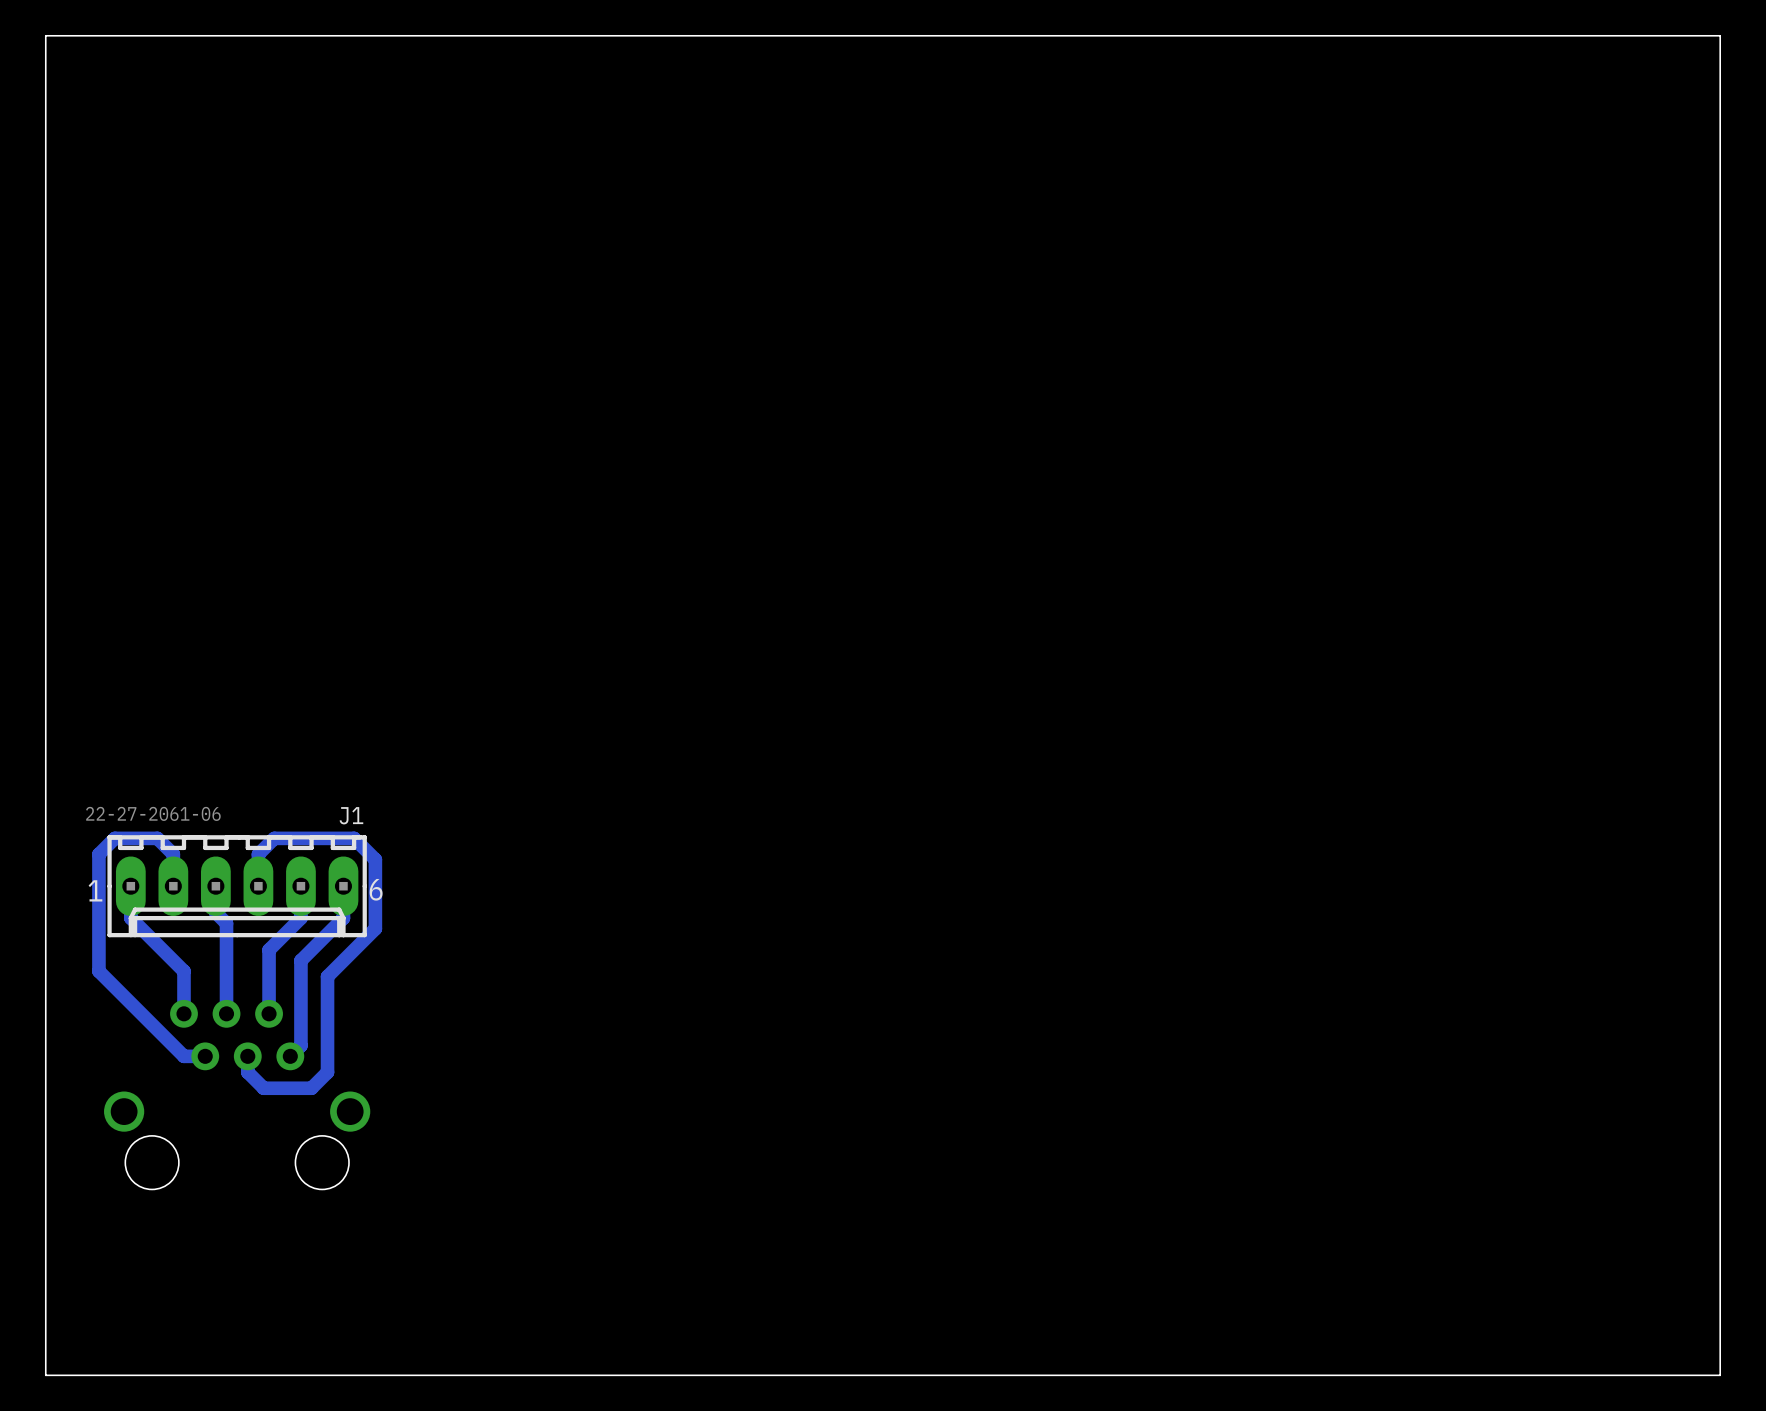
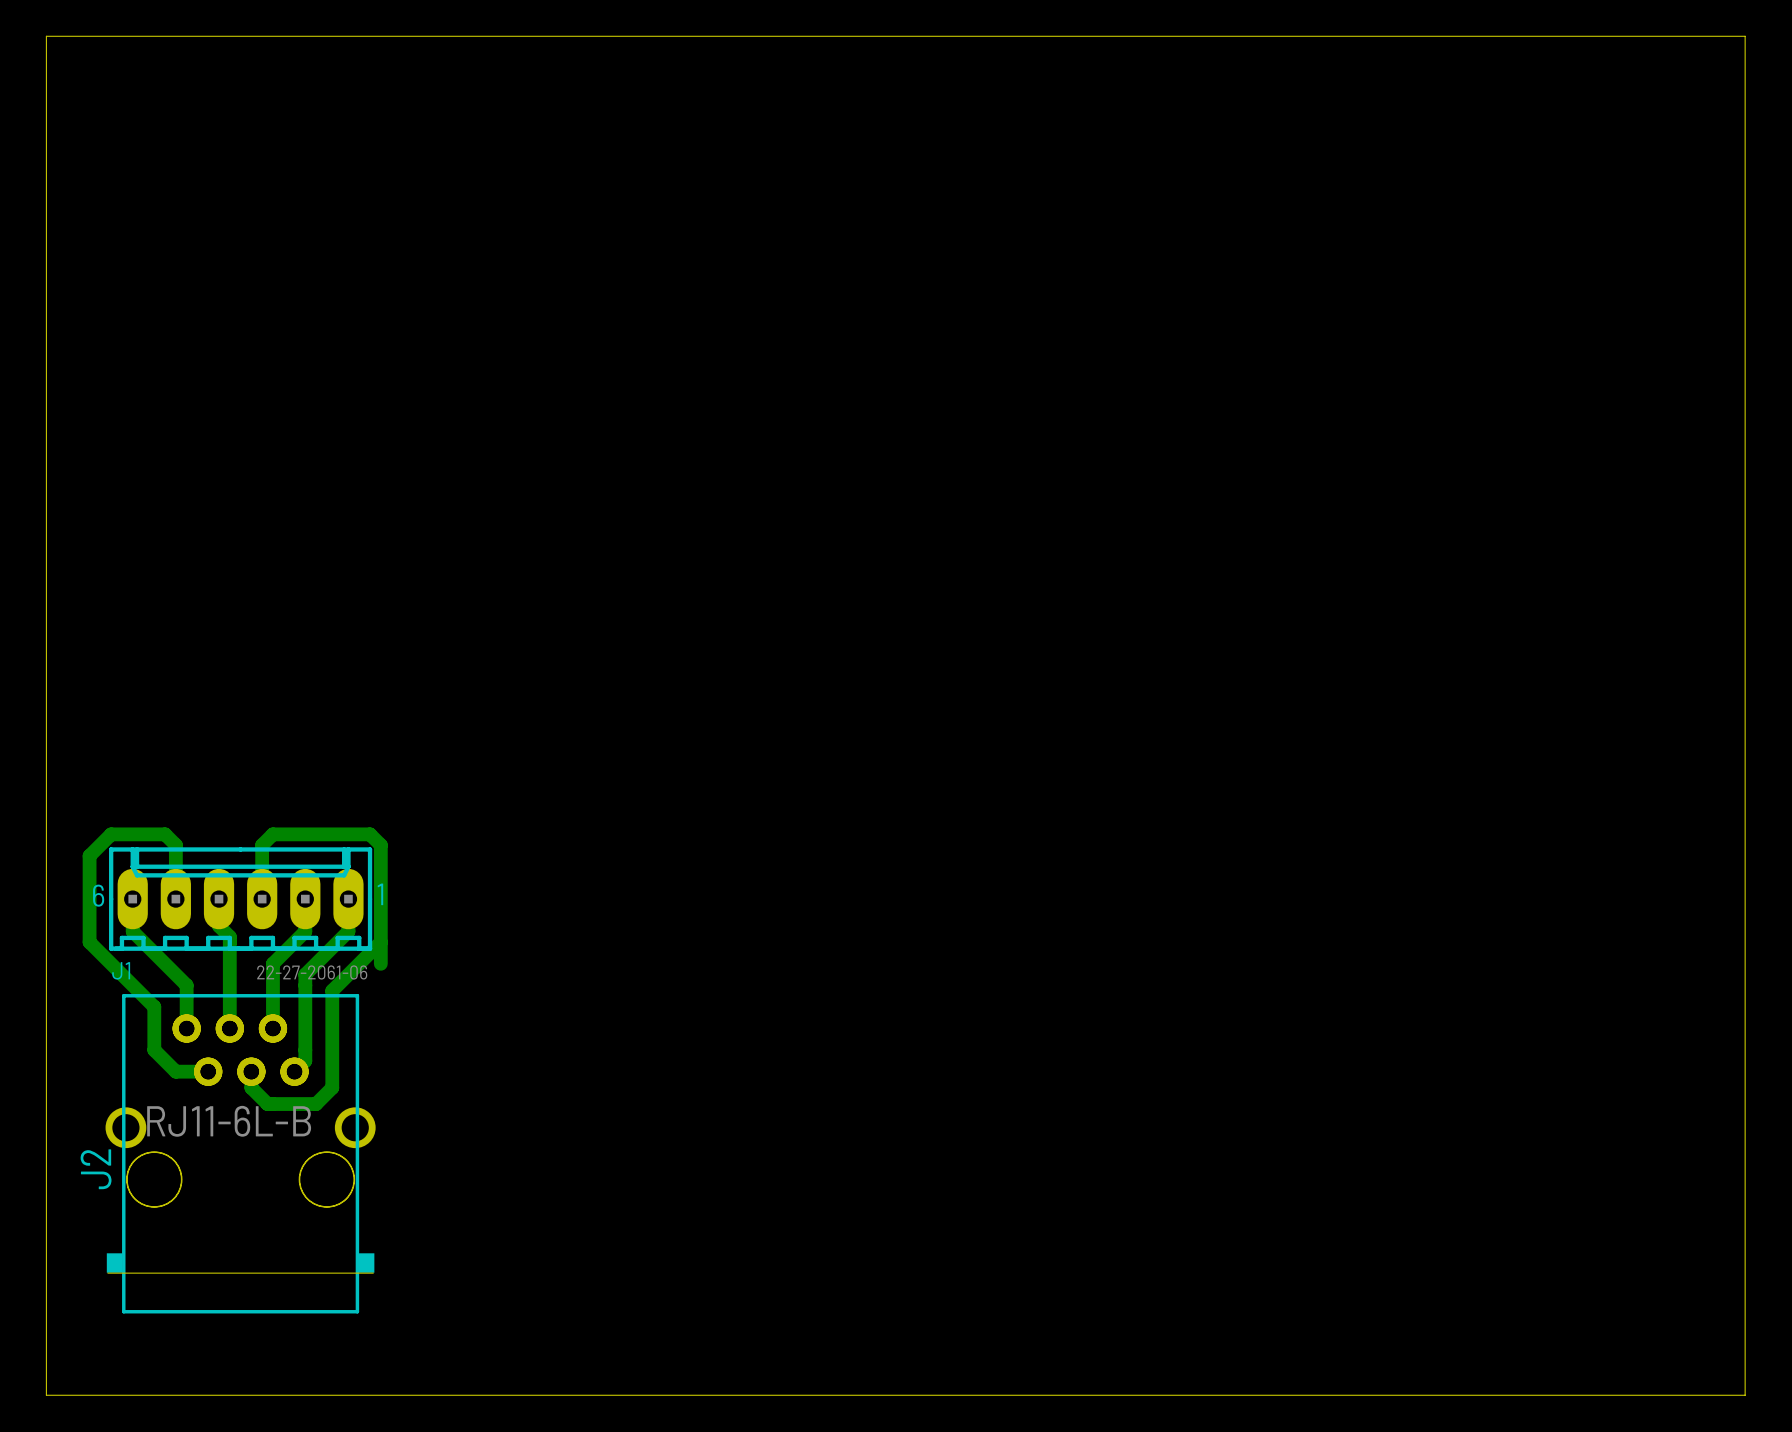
J1 value position: 22-27-2061-06 (153, 813) -> 22-27-2061-06 (312, 972)
J1 name position: J1 (351, 815) -> J1 (121, 970)
J1 footprint: [107, 835, 367, 938] -> [108, 847, 373, 951]
bottom track: (173, 854) (157, 838) (114, 838) (98, 854) (98, 971) (183, 1056) -> (175, 866) (175, 845) (165, 834) (111, 834) (89, 855) (89, 942) (154, 1006) (154, 1050) (175, 1071) (186, 1071)
bottom track: (258, 854) (274, 838) (354, 838) (375, 859) -> (262, 866) (262, 845) (272, 834) (370, 834) (380, 845) (380, 872)
J2: none -> RJ11-6L-B (240, 1153)

